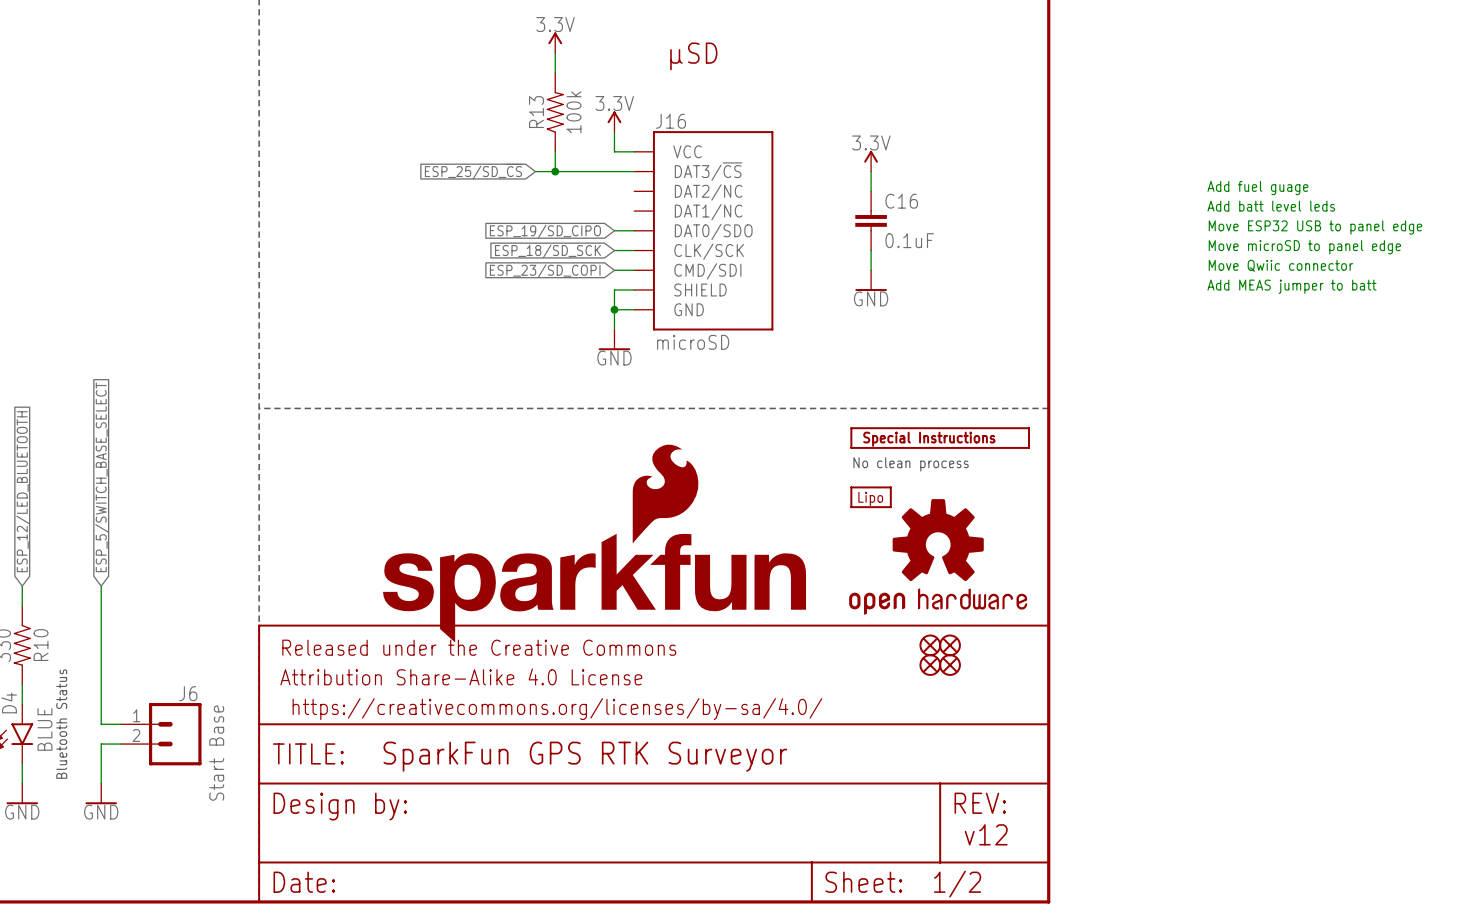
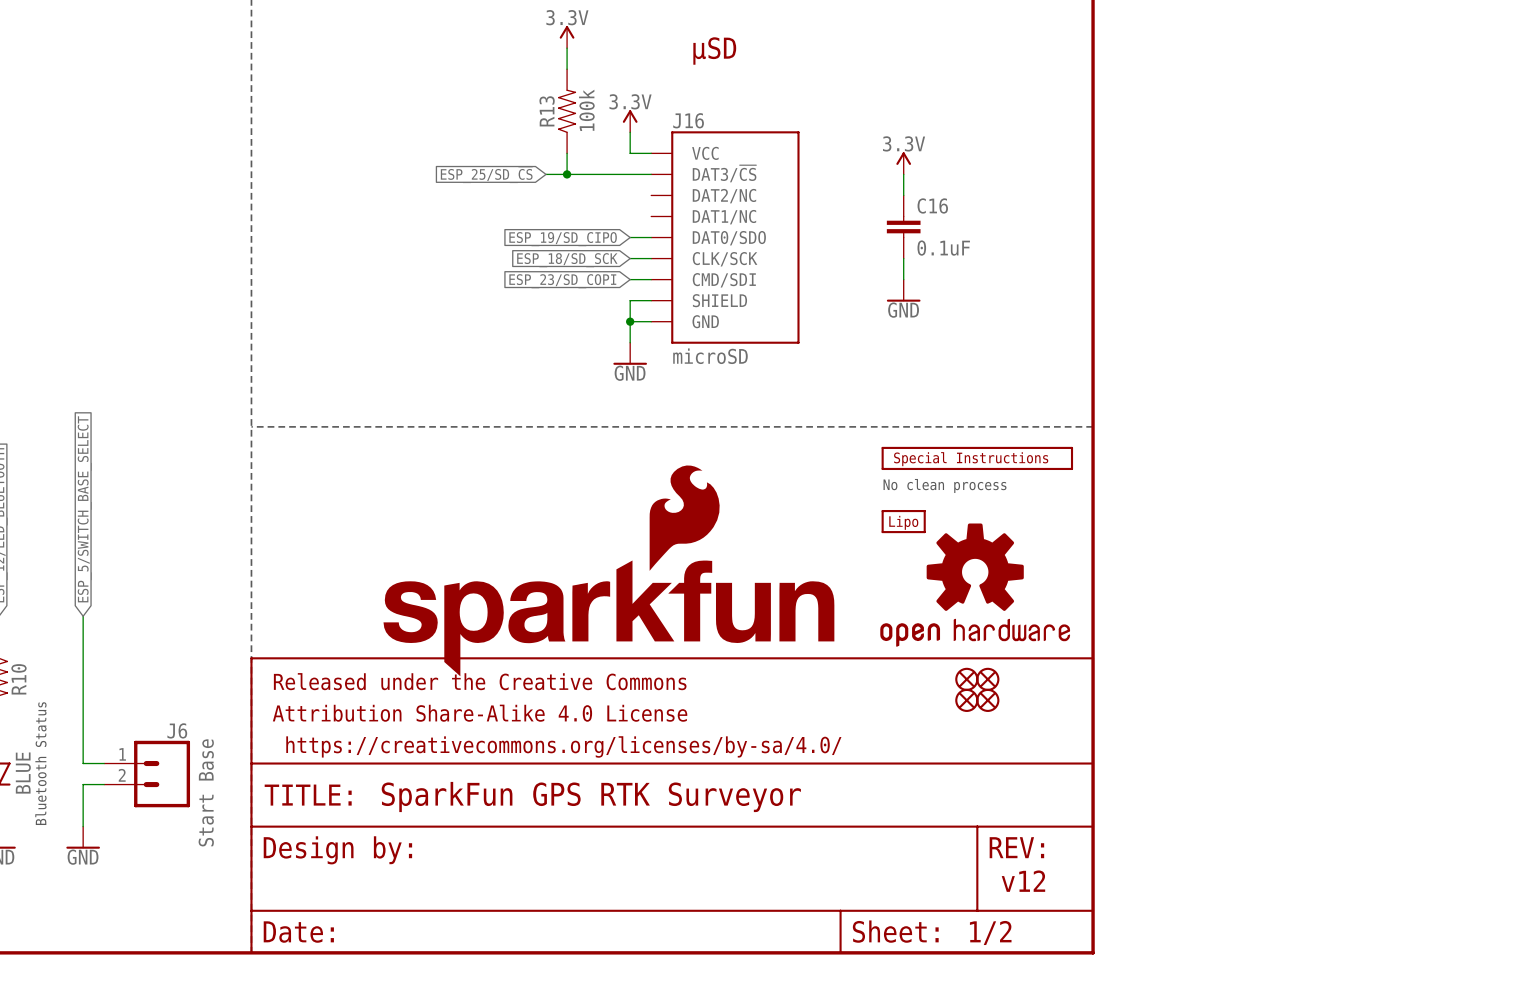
text: Add fuel guage (1257, 188) -> none
text: Add batt level leds (1271, 206) -> none
text: Move ESP32 USB to panel edge (1315, 227) -> none
text: Move microSD to panel edge (1304, 247) -> none
text: Move Qwiic connector (1280, 265) -> none
text: Add MEAS jumper to batt (1291, 286) -> none

